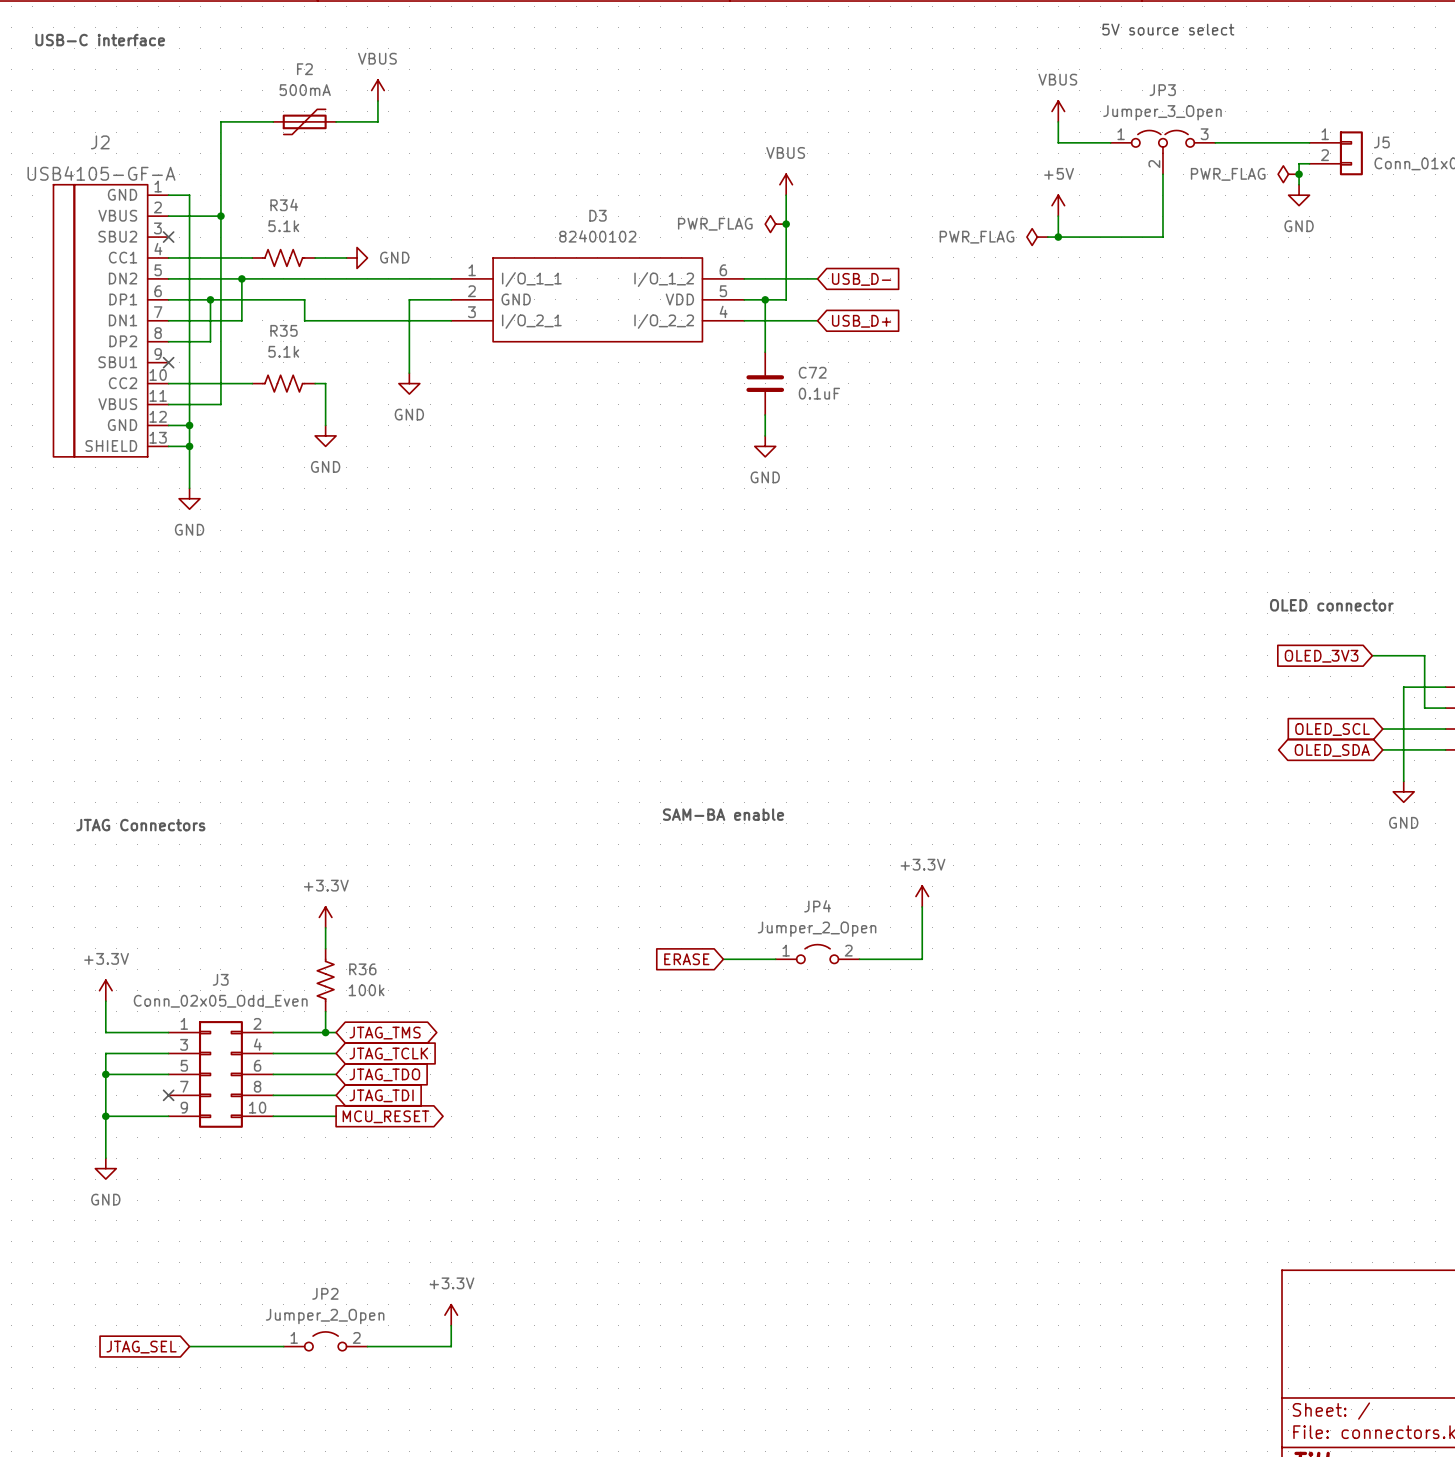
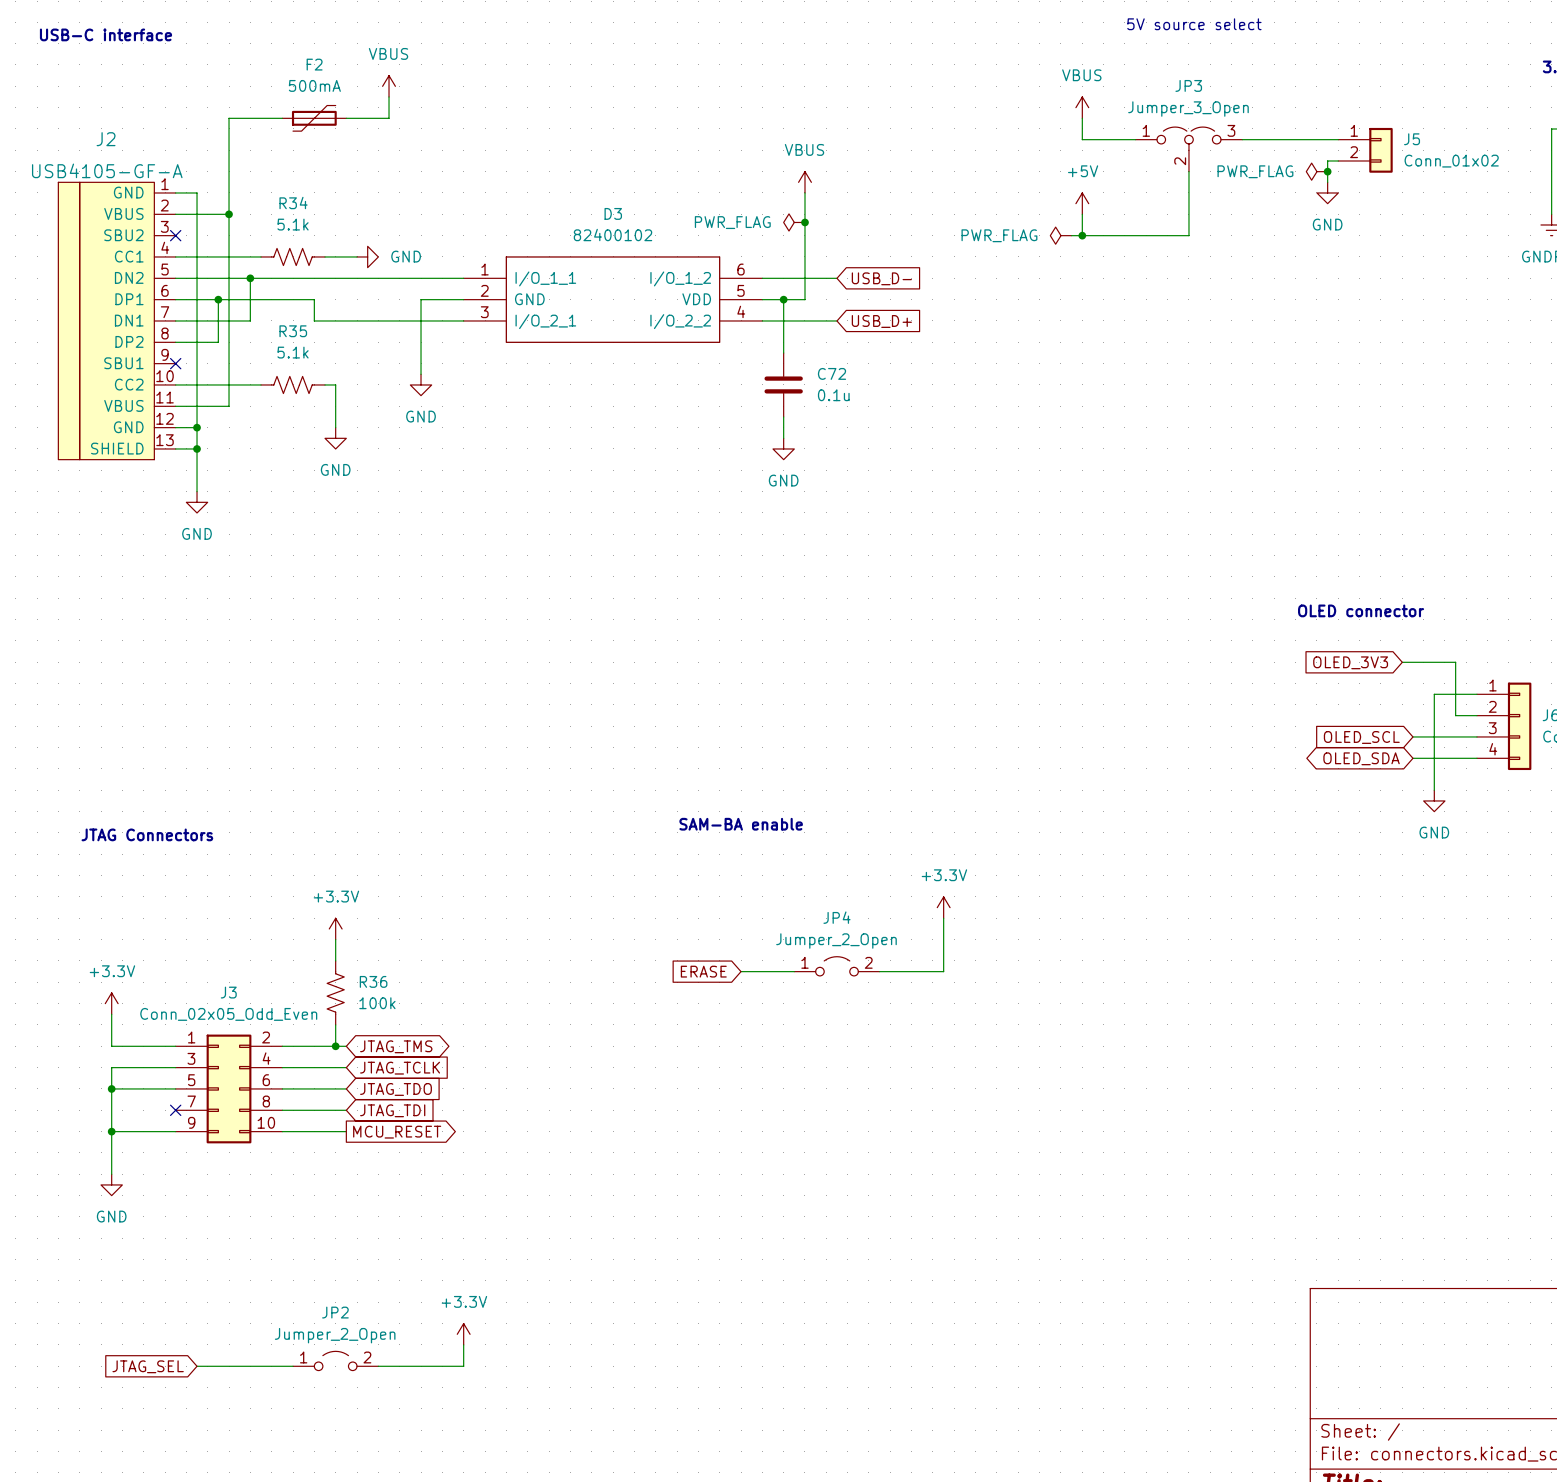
C72 value: 0.1uF (819, 393) -> 0.1u (833, 395)

